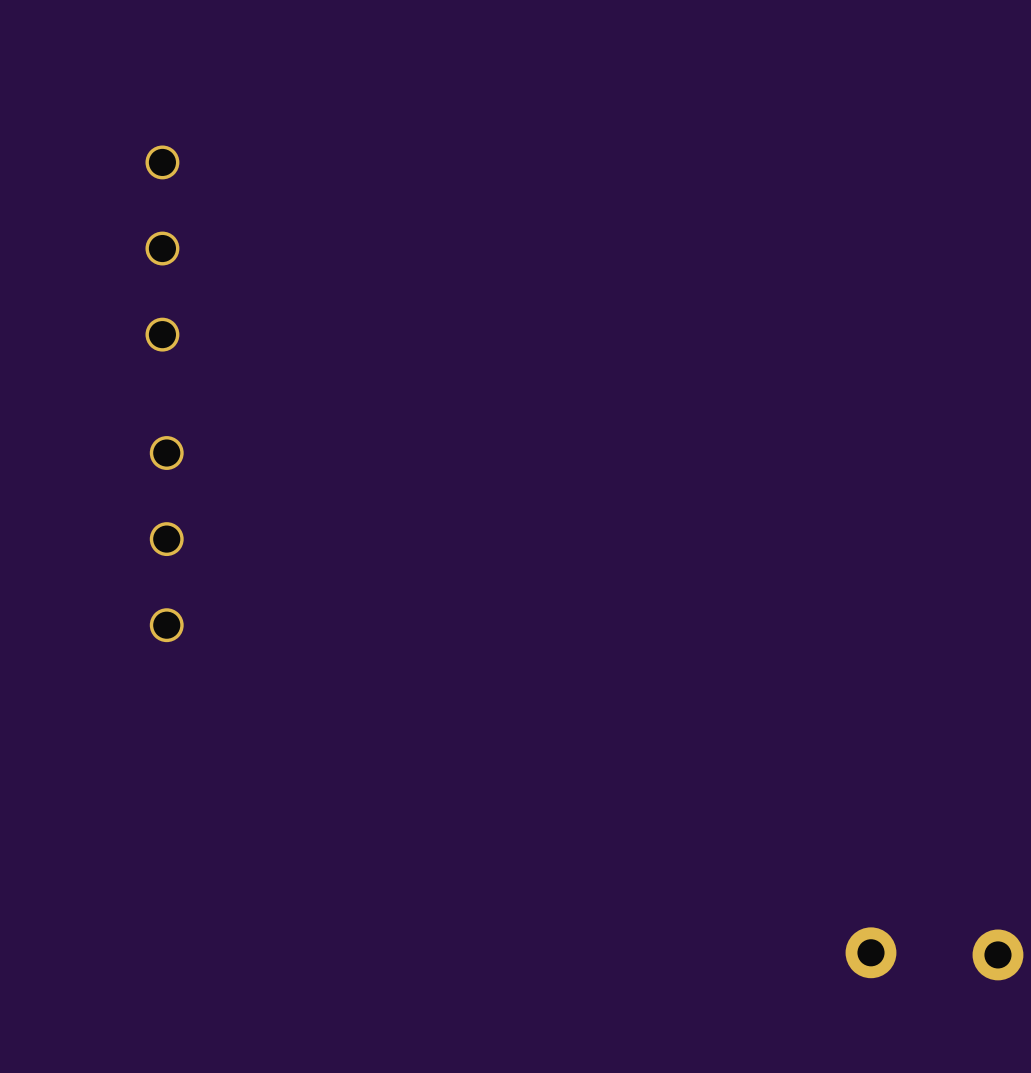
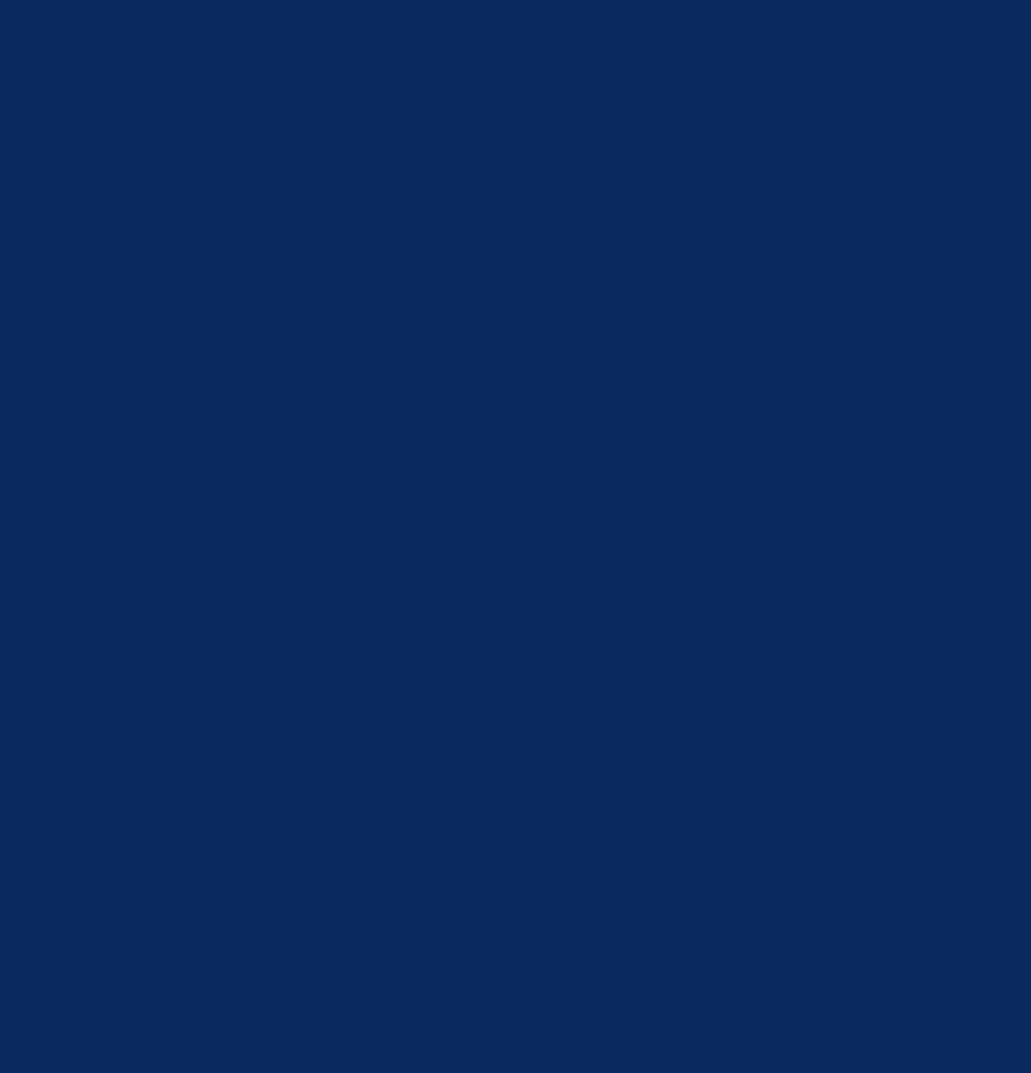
part: (162, 248) -> none
part: (166, 539) -> none
part: (870, 952) -> none
part: (997, 954) -> none

